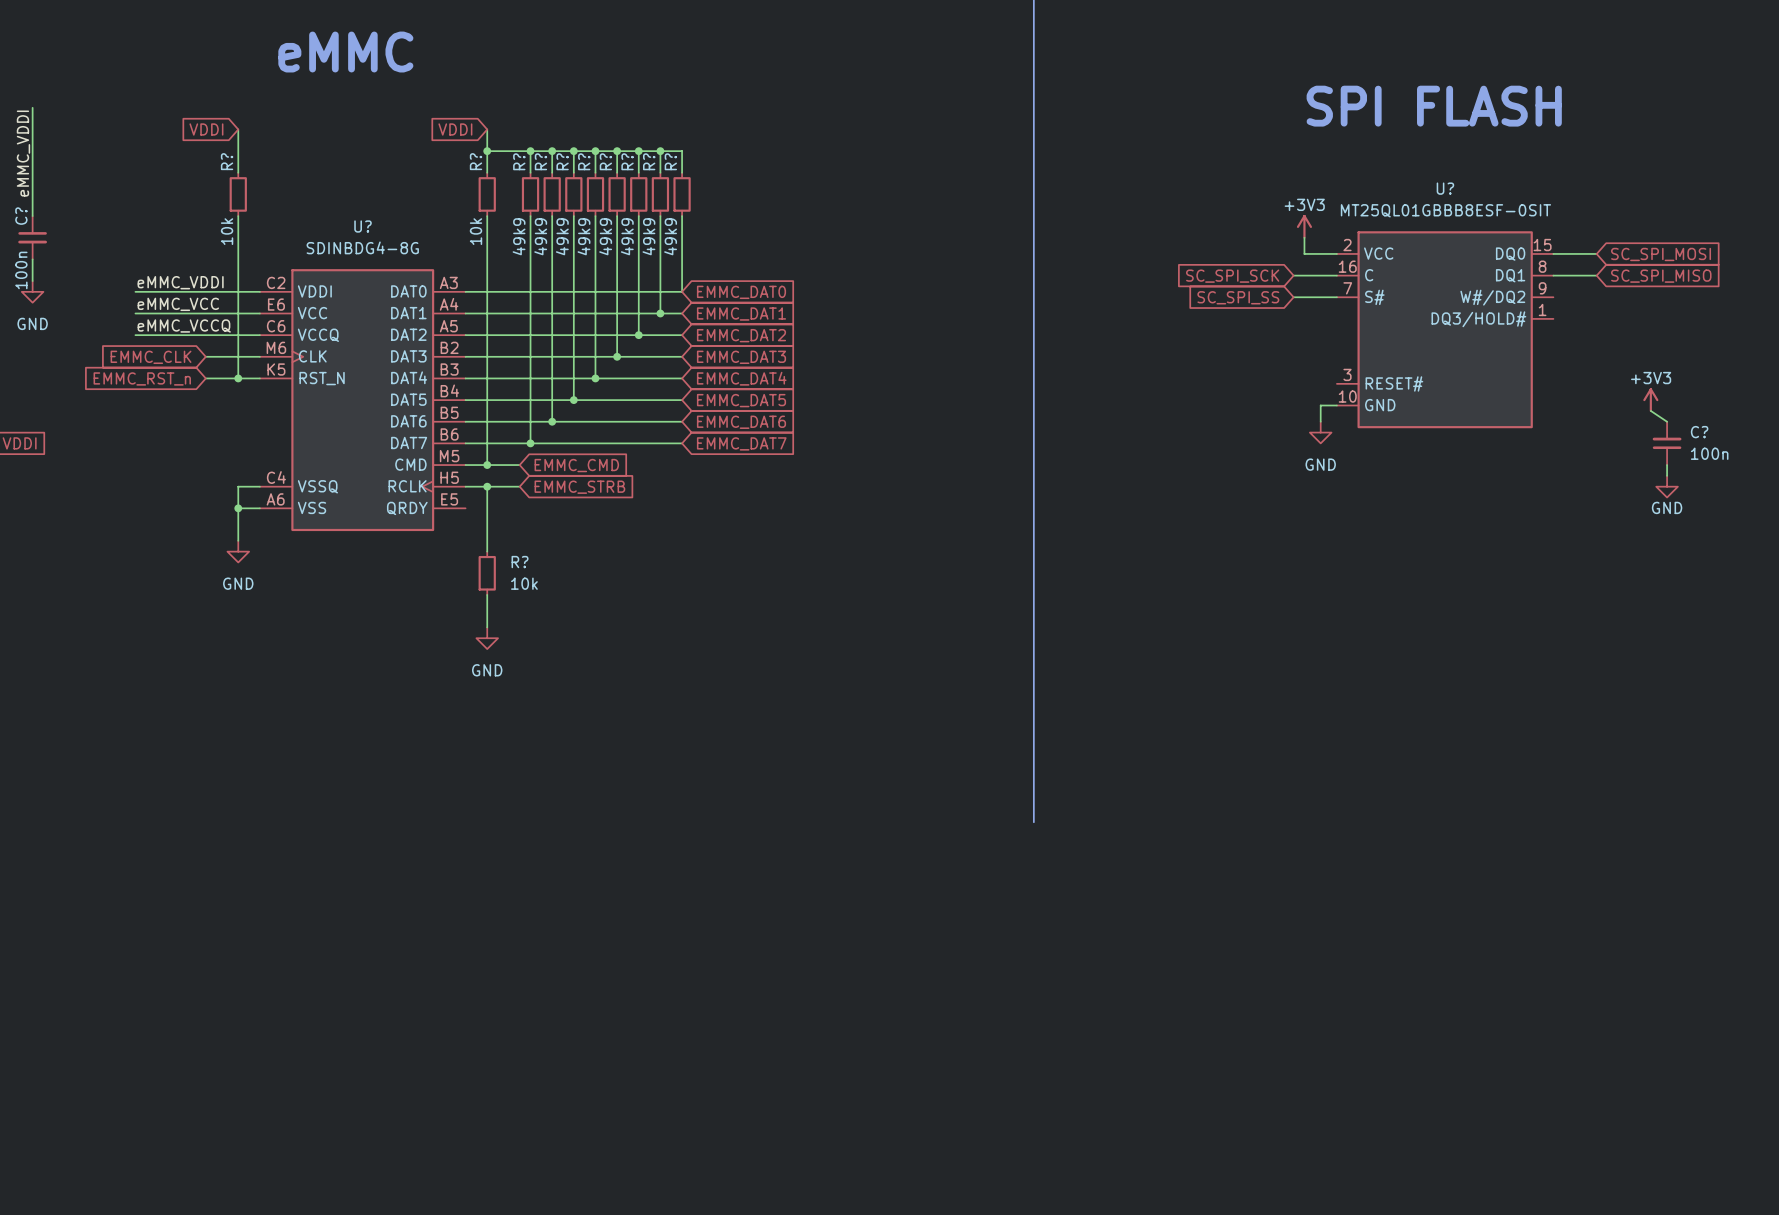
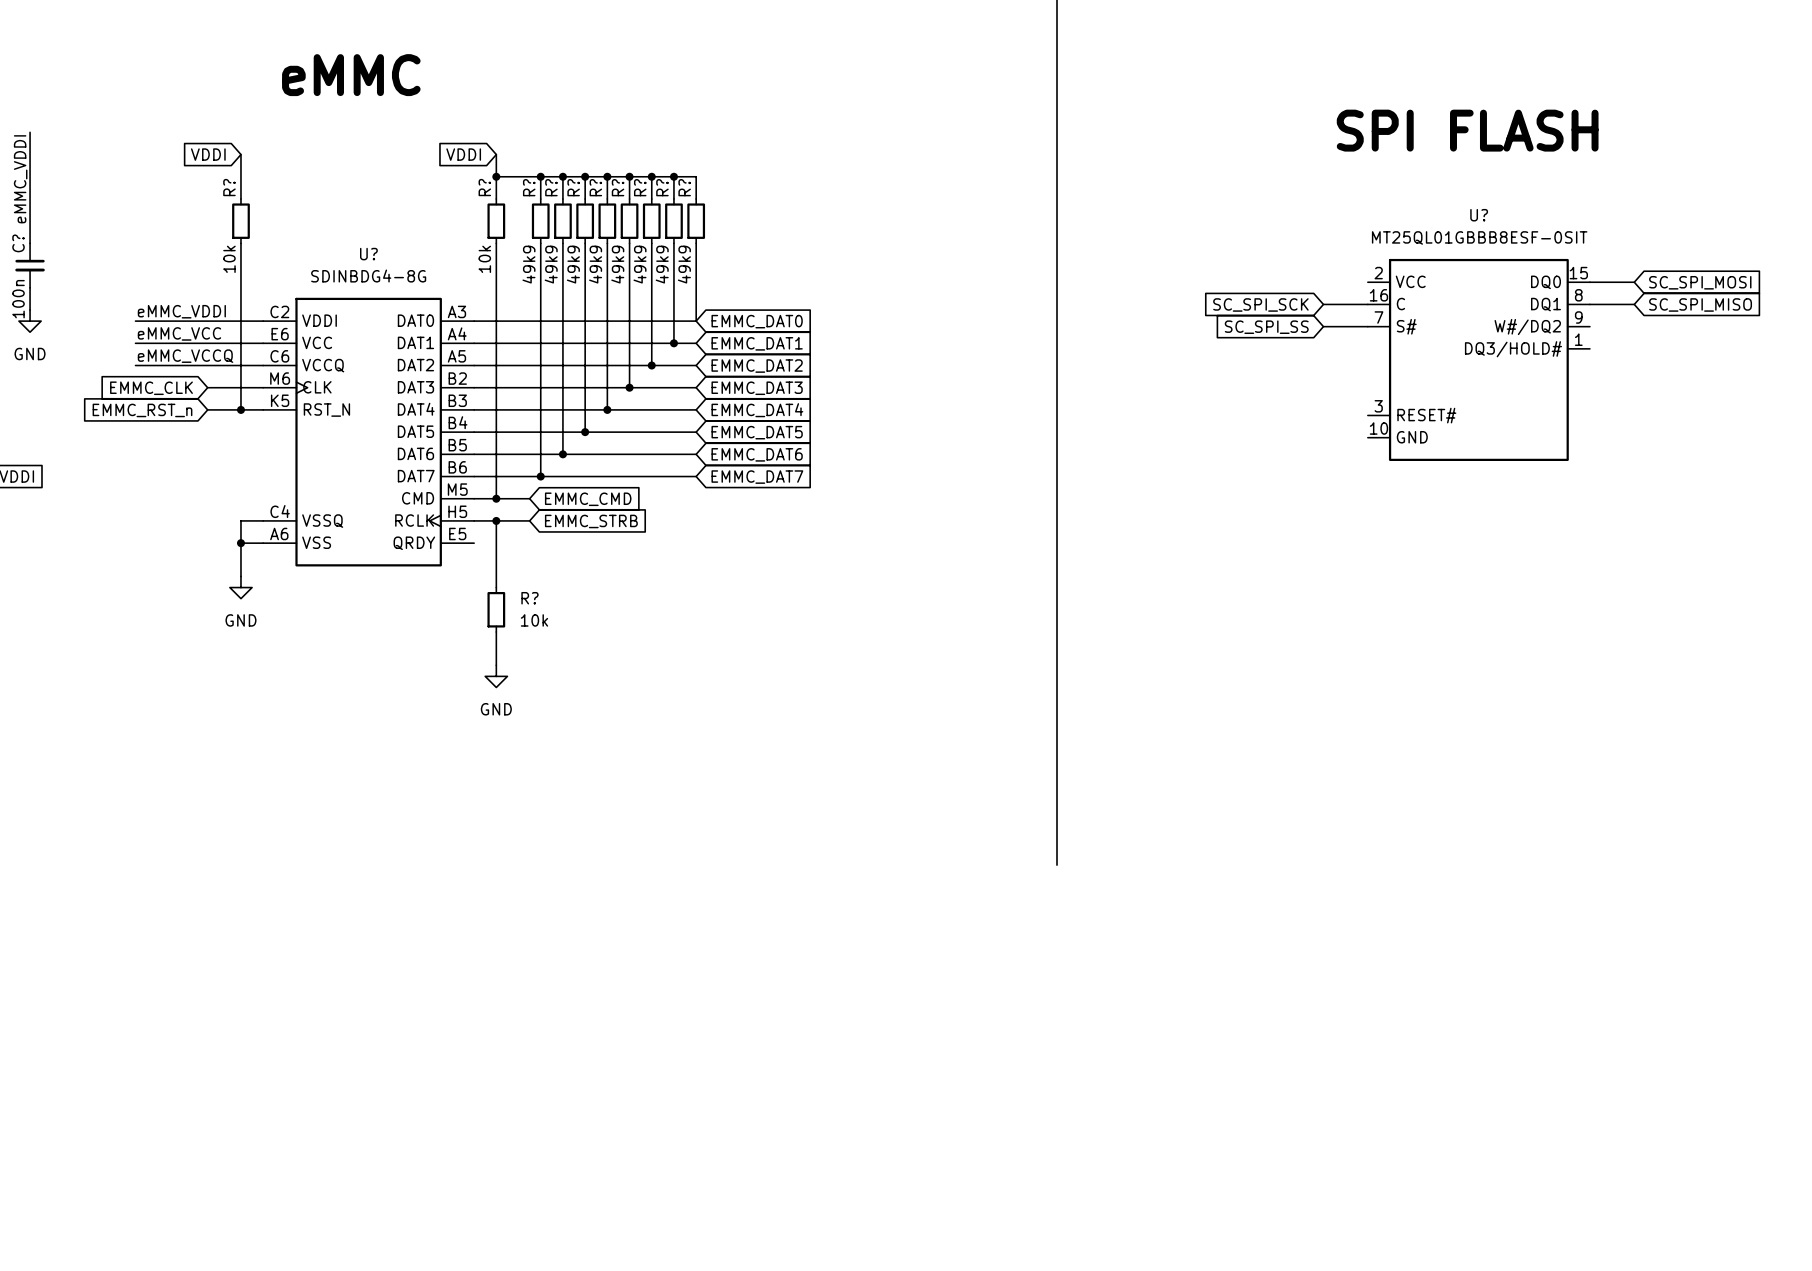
power symbol: +3V3 (1304, 226) -> none
wire: (1304, 237) (1304, 253) (1336, 253) -> none
power symbol: +3V3 (1650, 400) -> none
wire: (1336, 405) (1320, 405) (1320, 421) -> none
wire: (1650, 410) (1667, 421) -> none
power symbol: GND (1320, 432) -> none
C?: (1667, 443) -> none
wire: (1667, 465) (1667, 475) -> none
power symbol: GND (1667, 486) -> none

